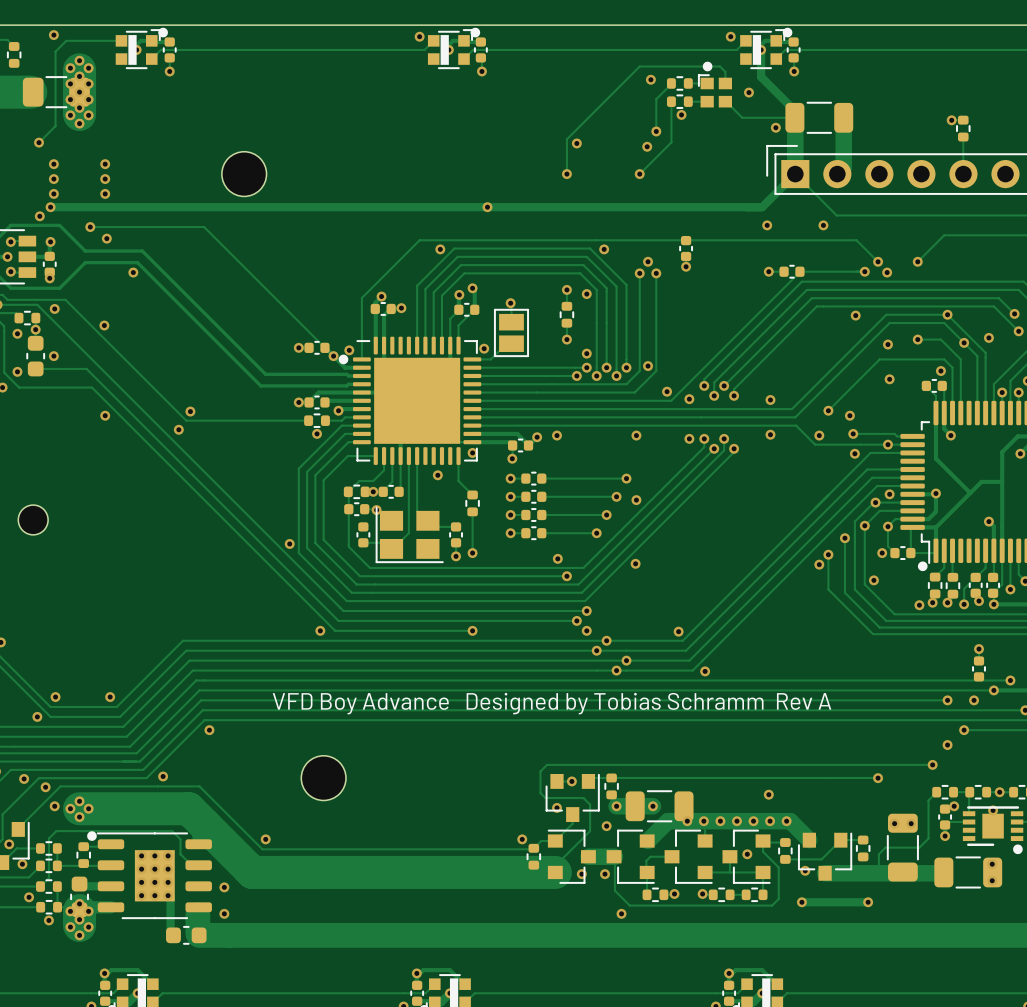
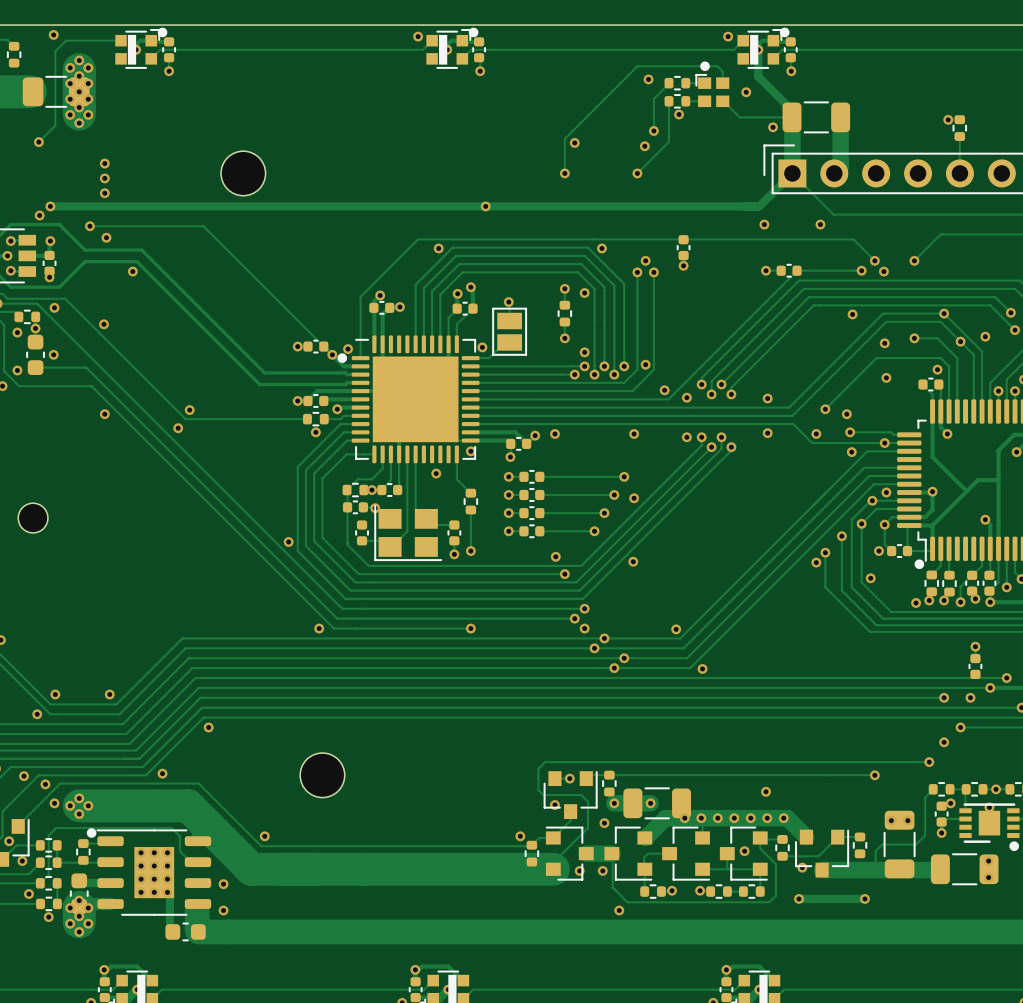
via: (53, 164) -> none
via: (53, 179) -> none
via: (53, 193) -> none
text: VFD Boy Advance Designed by Tobias Schramm Rev A (552, 703) -> none

